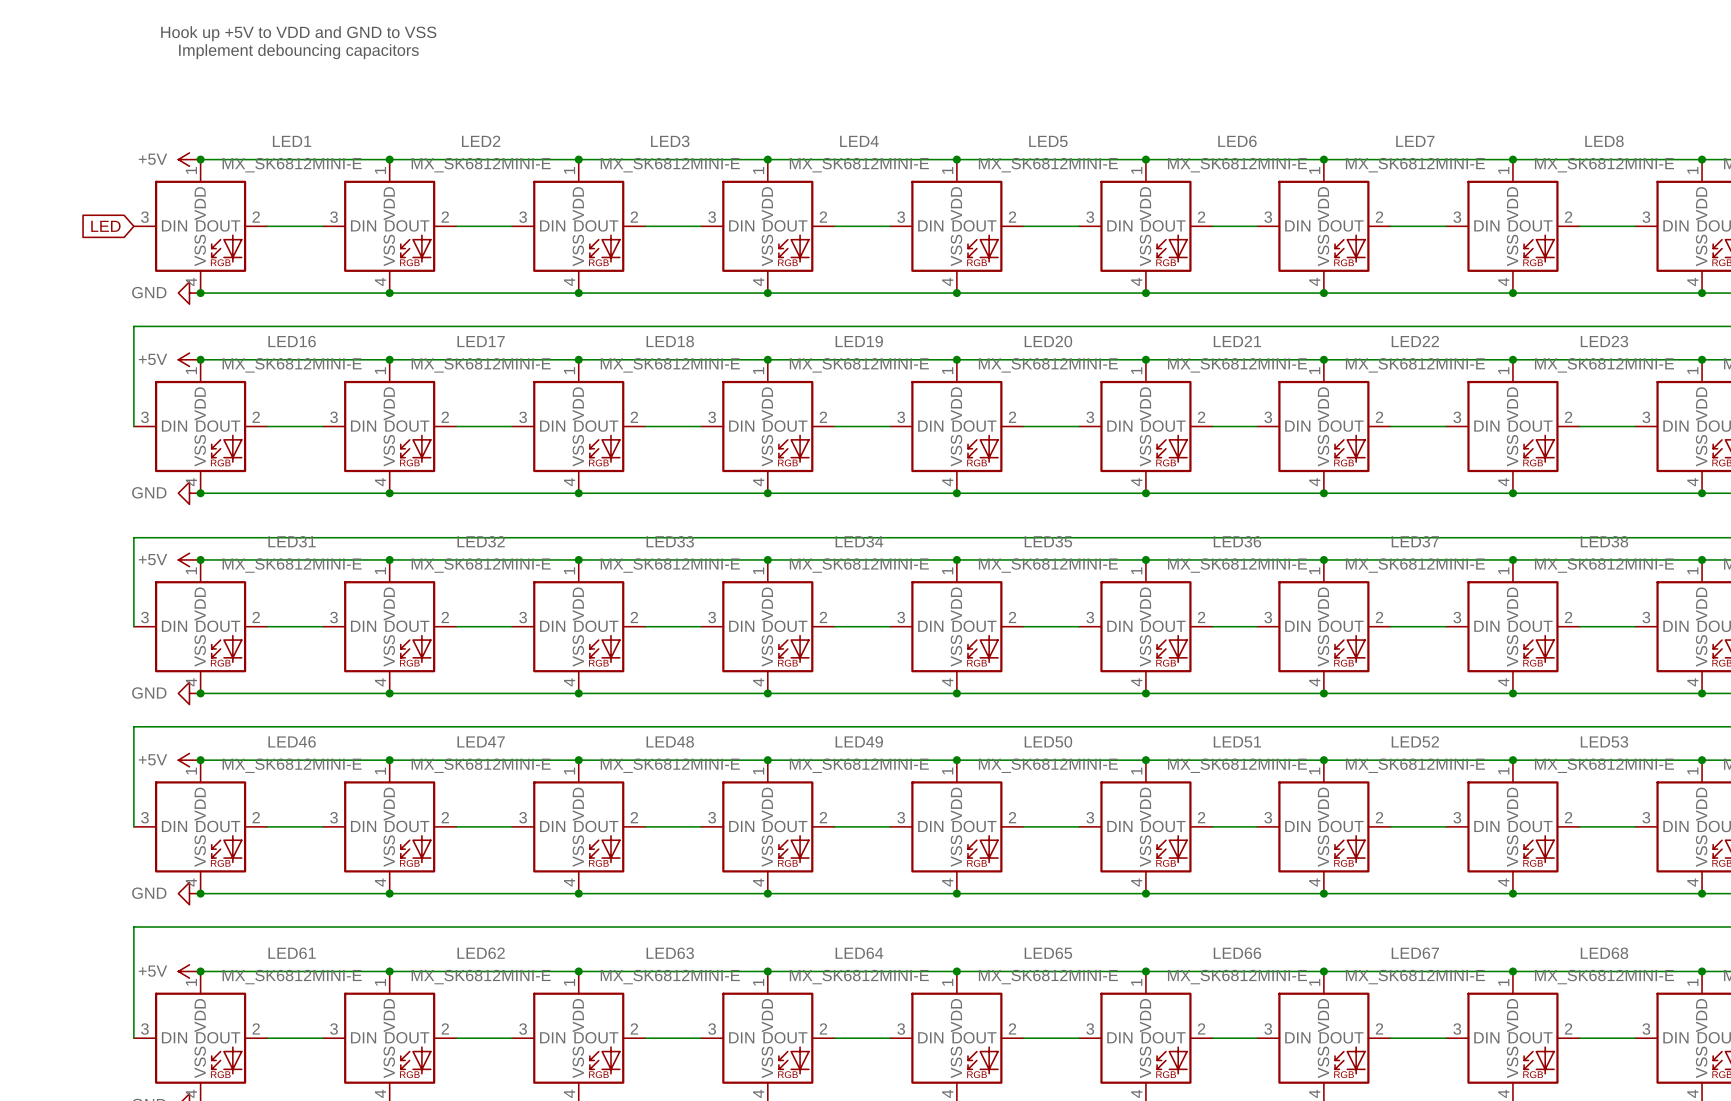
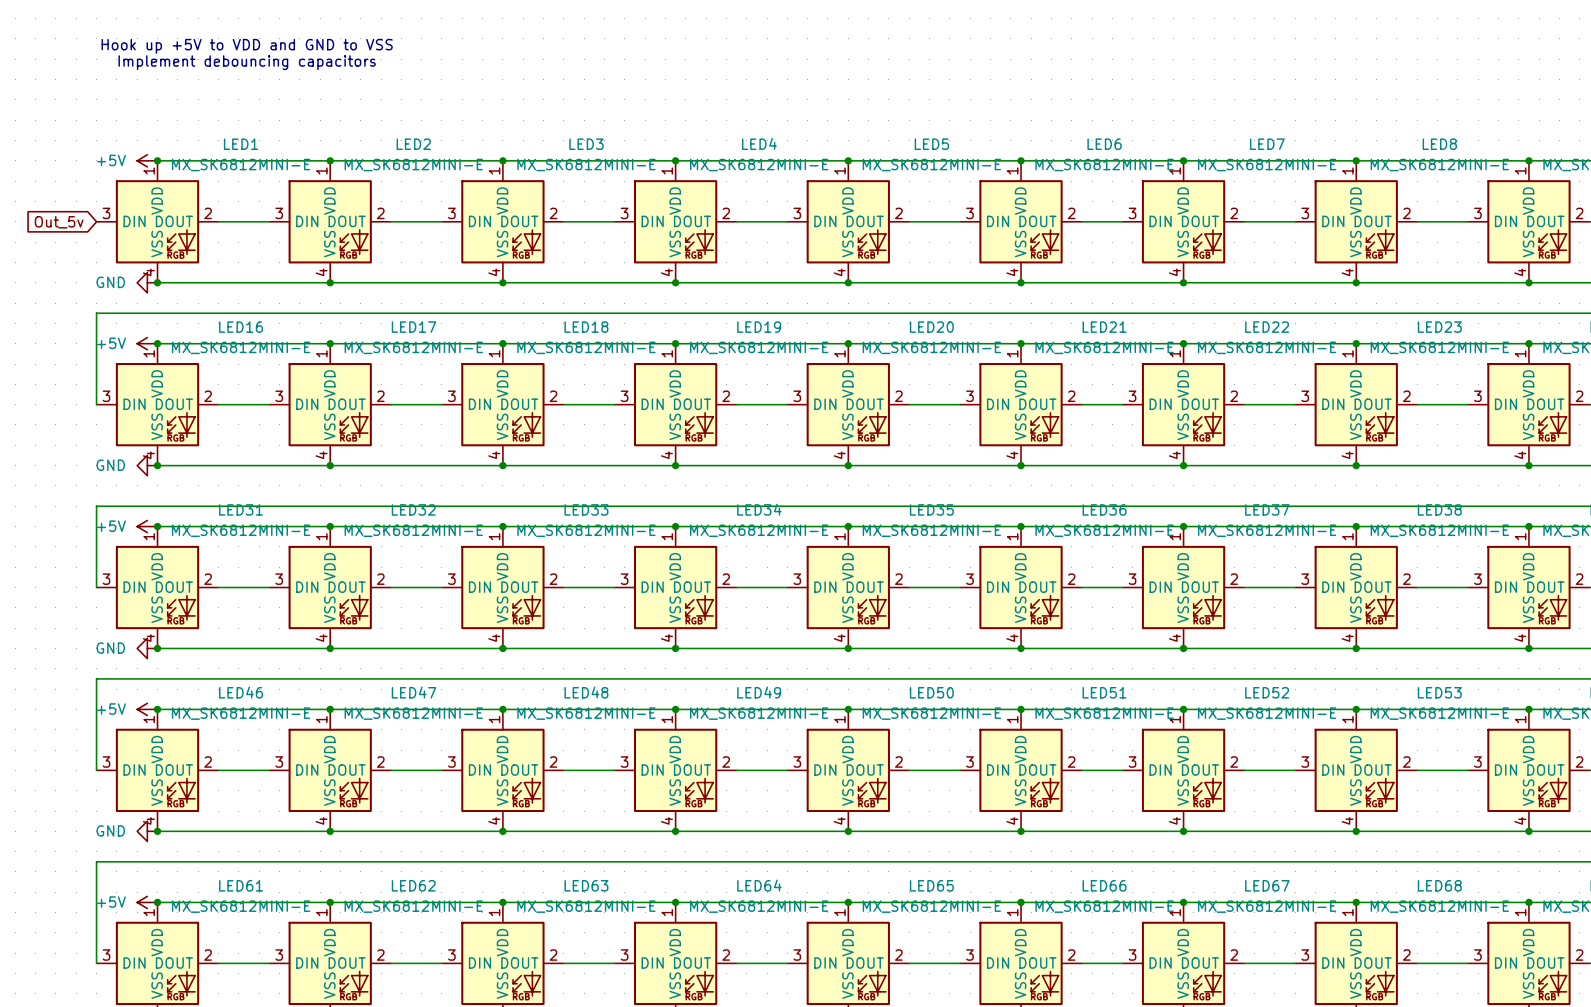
global label: LED (105, 226) -> Out_5v (59, 222)

